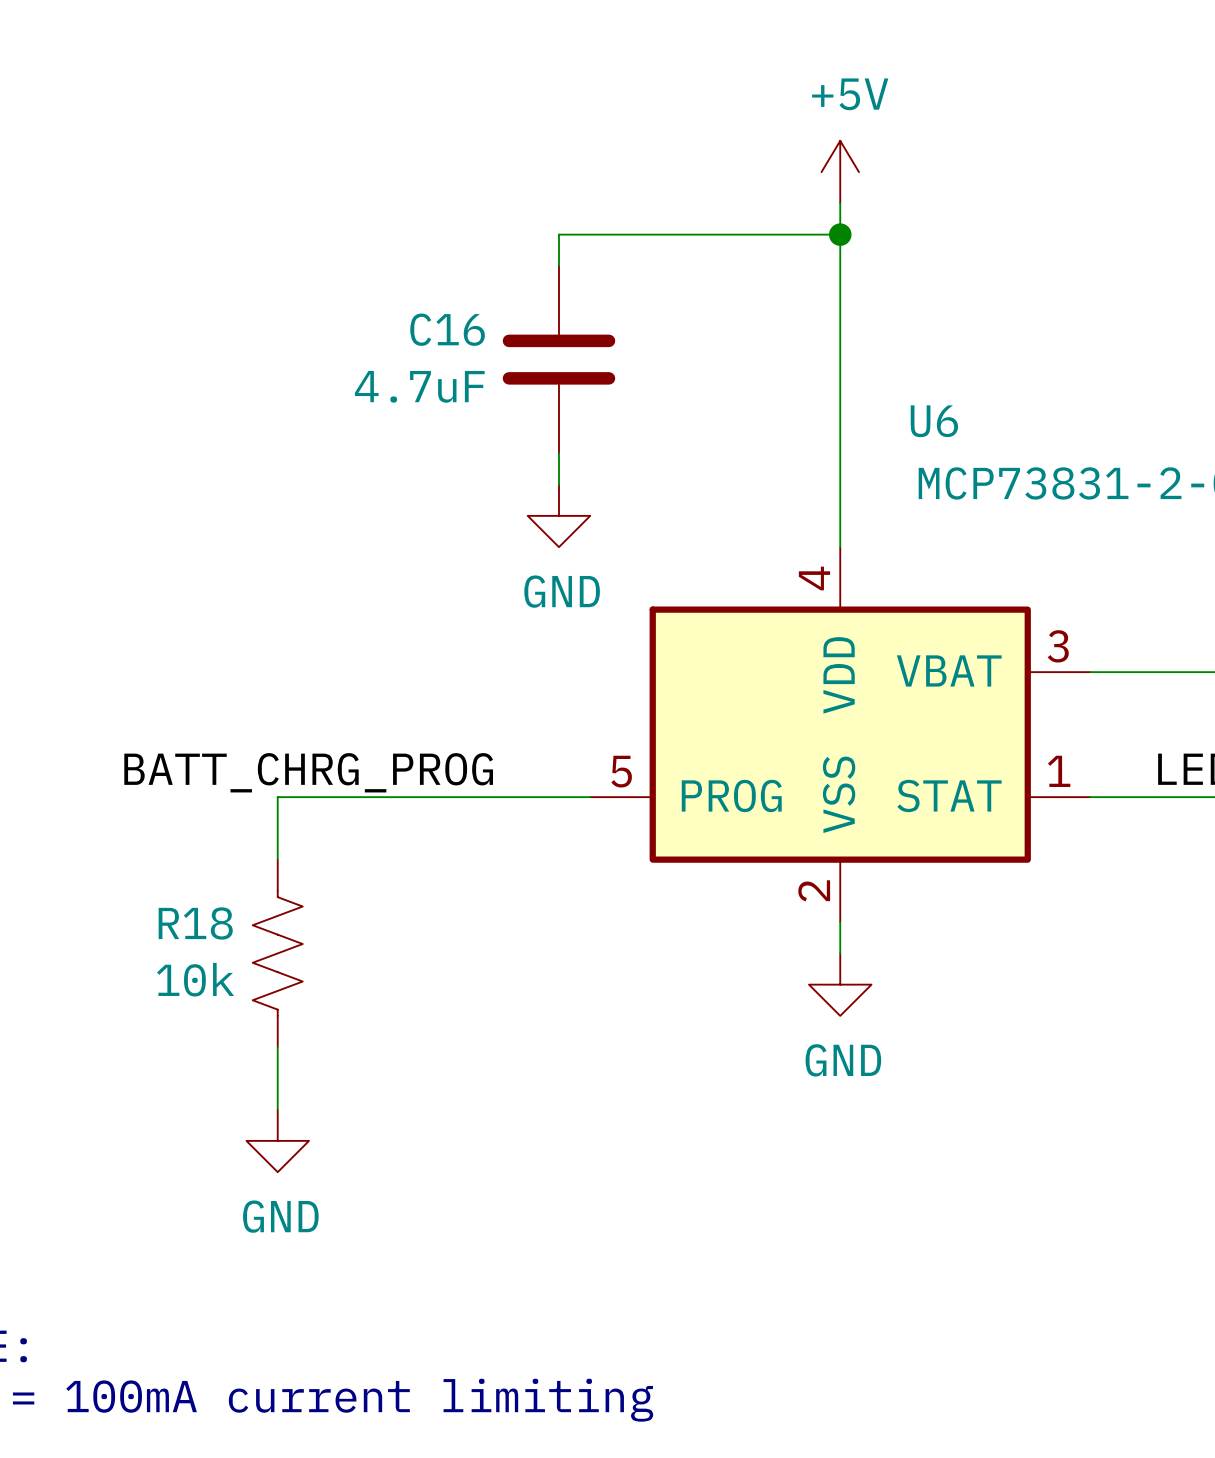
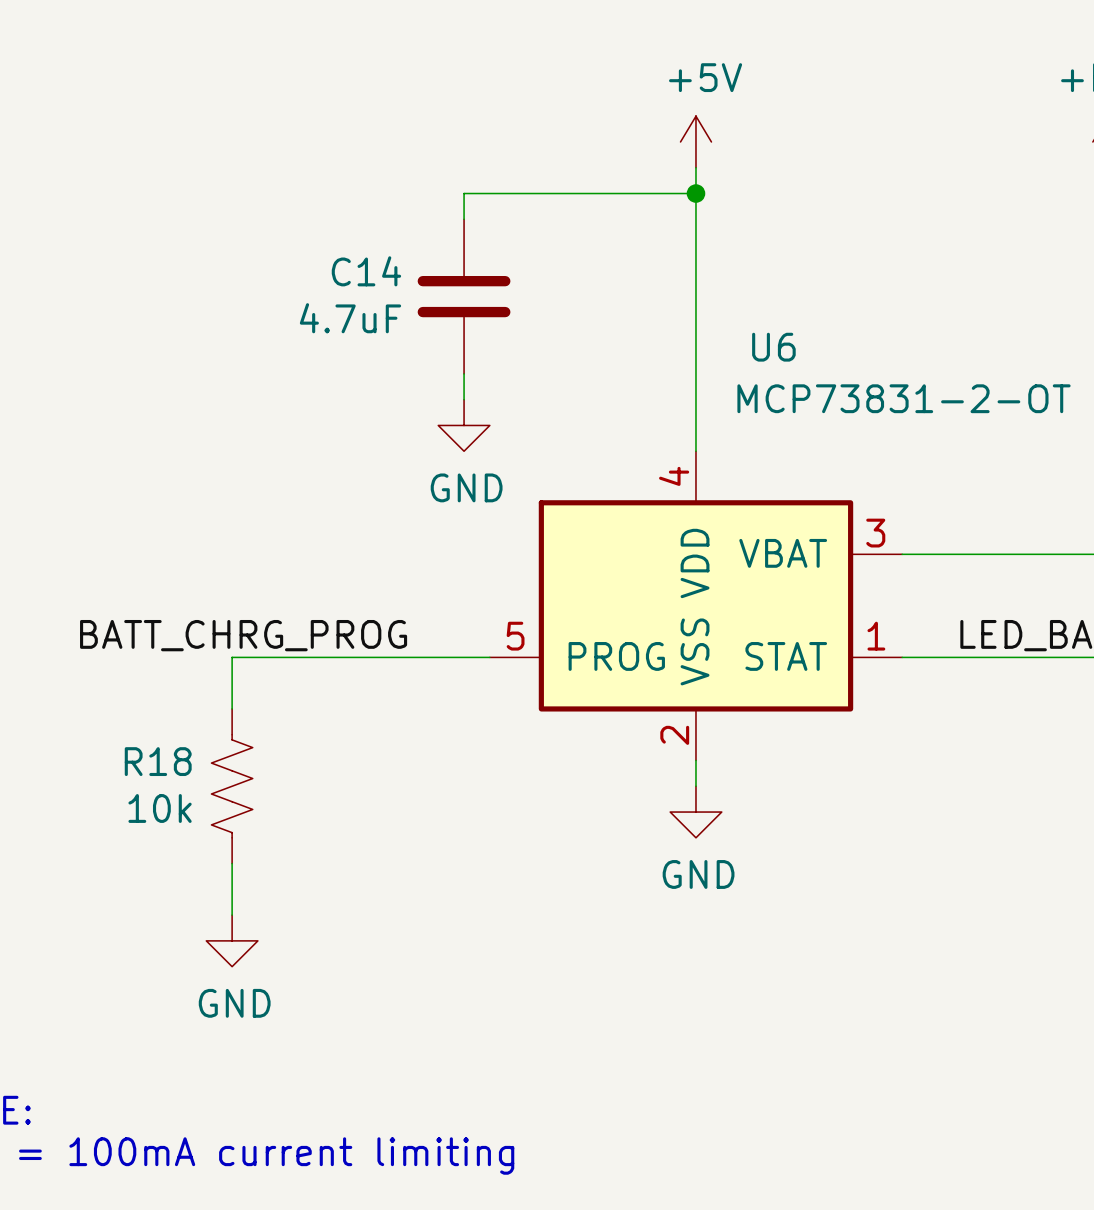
C16 name: C16 (447, 329) -> C14 (366, 271)

